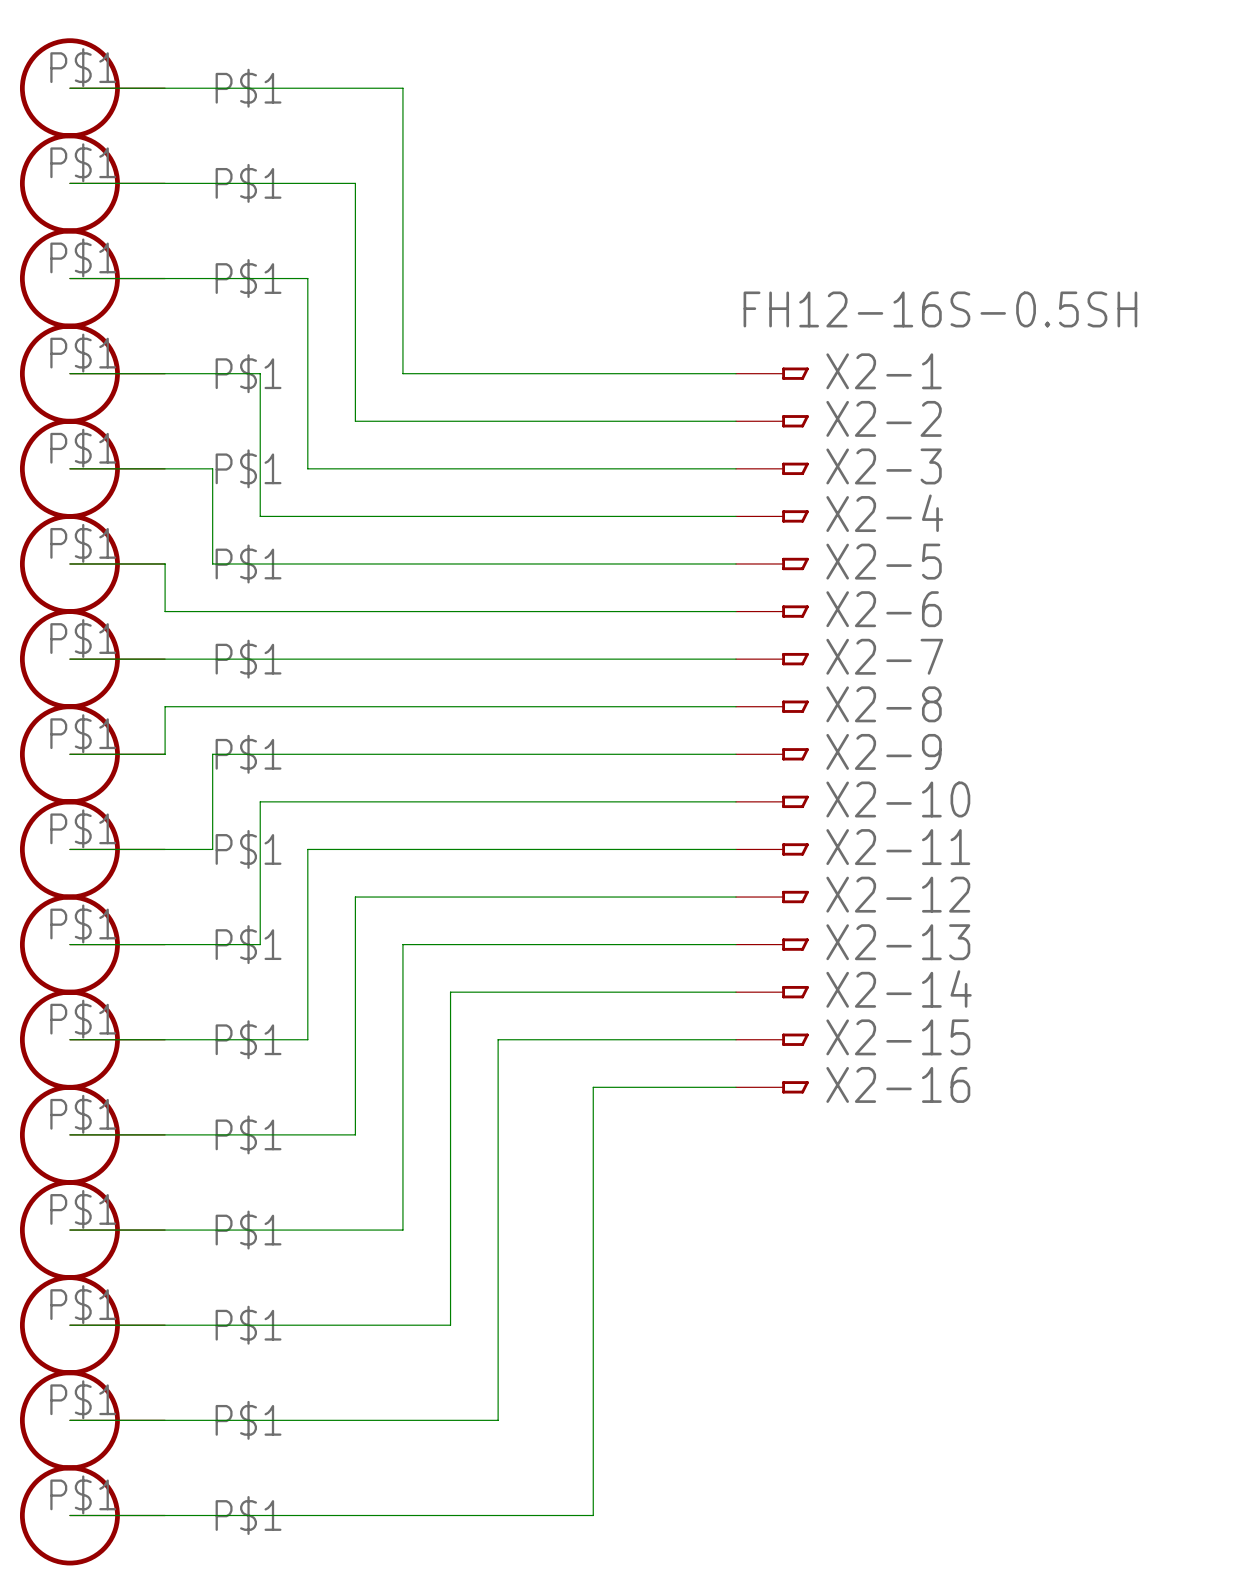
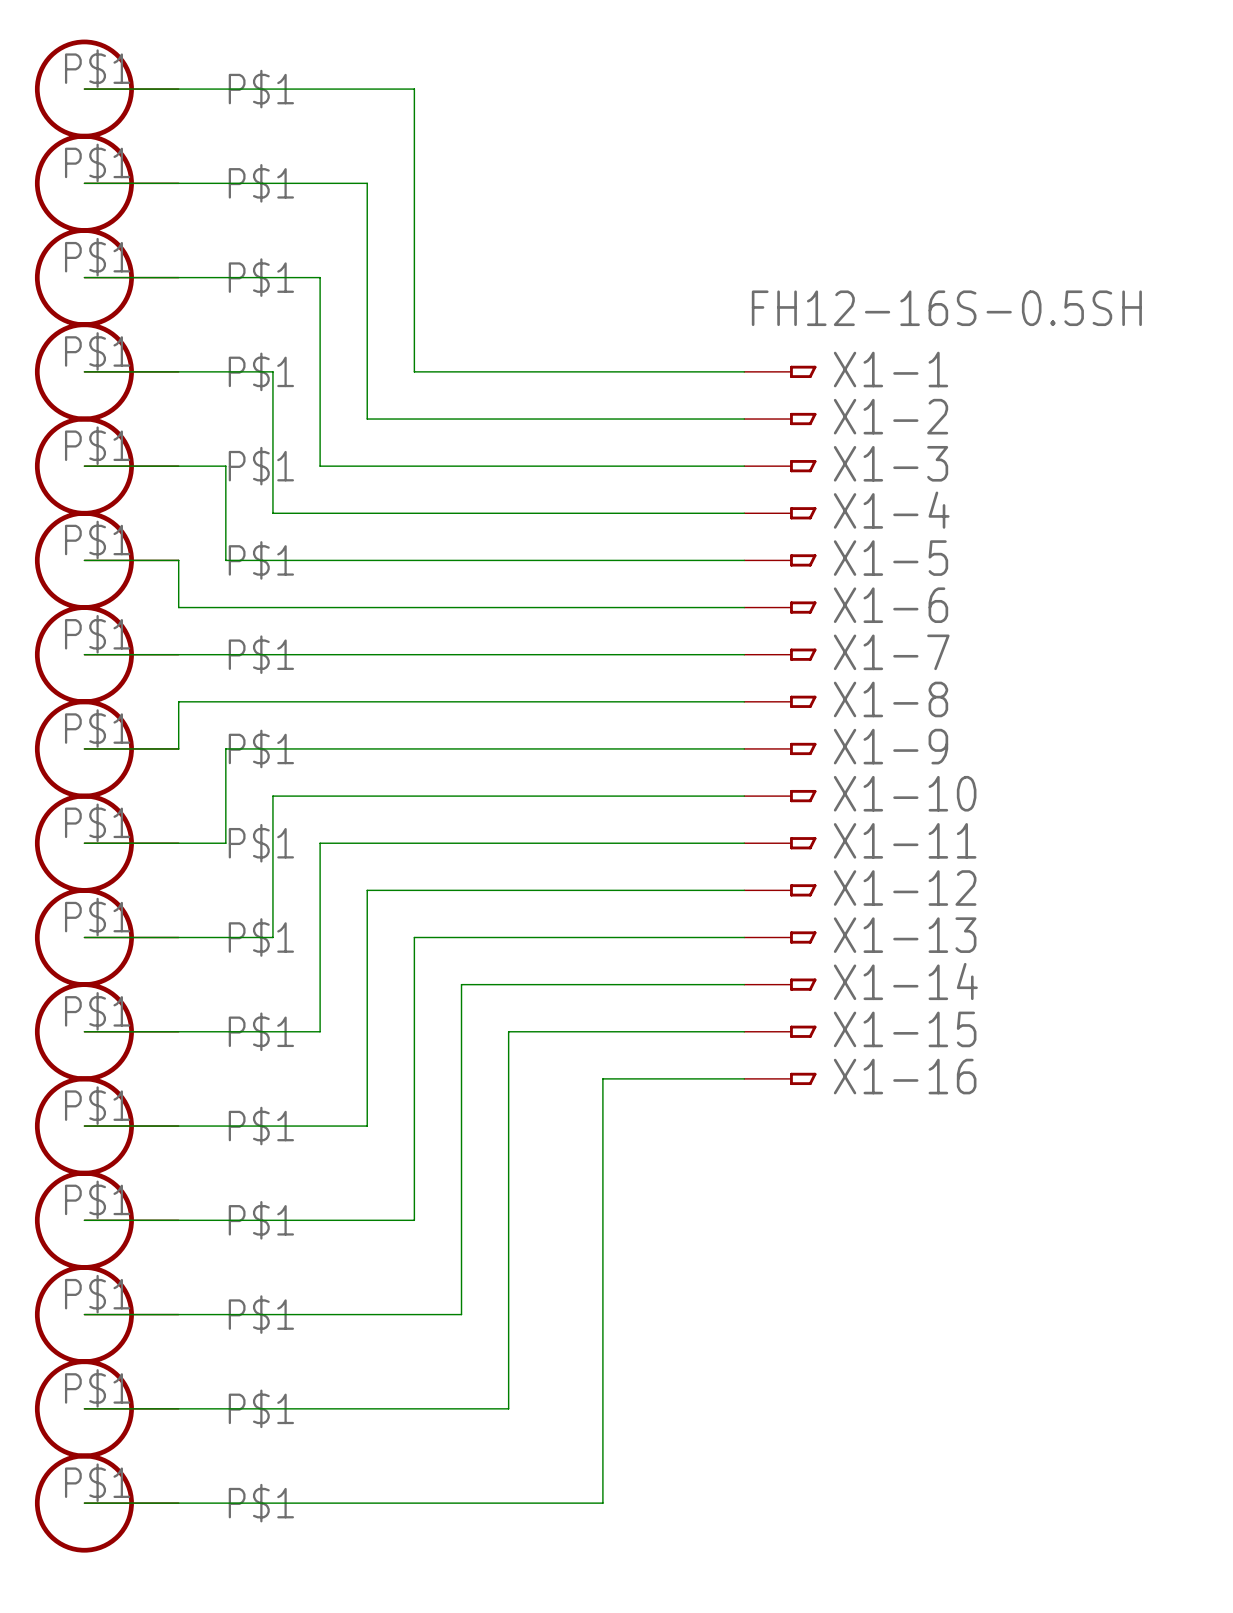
X2-1 name: X2-1 (884, 371) -> X1-1 (891, 369)
X2-2 name: X2-2 (884, 418) -> X1-2 (891, 416)
X2-3 name: X2-3 (884, 466) -> X1-3 (891, 463)
X2-4 name: X2-4 (884, 513) -> X1-4 (891, 510)
X2-5 name: X2-5 (884, 561) -> X1-5 (891, 558)
X2-6 name: X2-6 (884, 609) -> X1-6 (891, 605)
X2-7 name: X2-7 (884, 656) -> X1-7 (891, 652)
X2-8 name: X2-8 (884, 704) -> X1-8 (891, 699)
X2-9 name: X2-9 (884, 751) -> X1-9 (891, 746)
X2-10 name: X2-10 (898, 799) -> X1-10 (905, 793)
X2-11 name: X2-11 (898, 847) -> X1-11 (905, 840)
X2-12 name: X2-12 (898, 894) -> X1-12 (905, 888)
X2-13 name: X2-13 (898, 942) -> X1-13 (905, 935)
X2-14 name: X2-14 (899, 989) -> X1-14 (905, 981)
X2-15 name: X2-15 (898, 1037) -> X1-15 (905, 1029)
X2-16 name: X2-16 (898, 1084) -> X1-16 (905, 1076)

